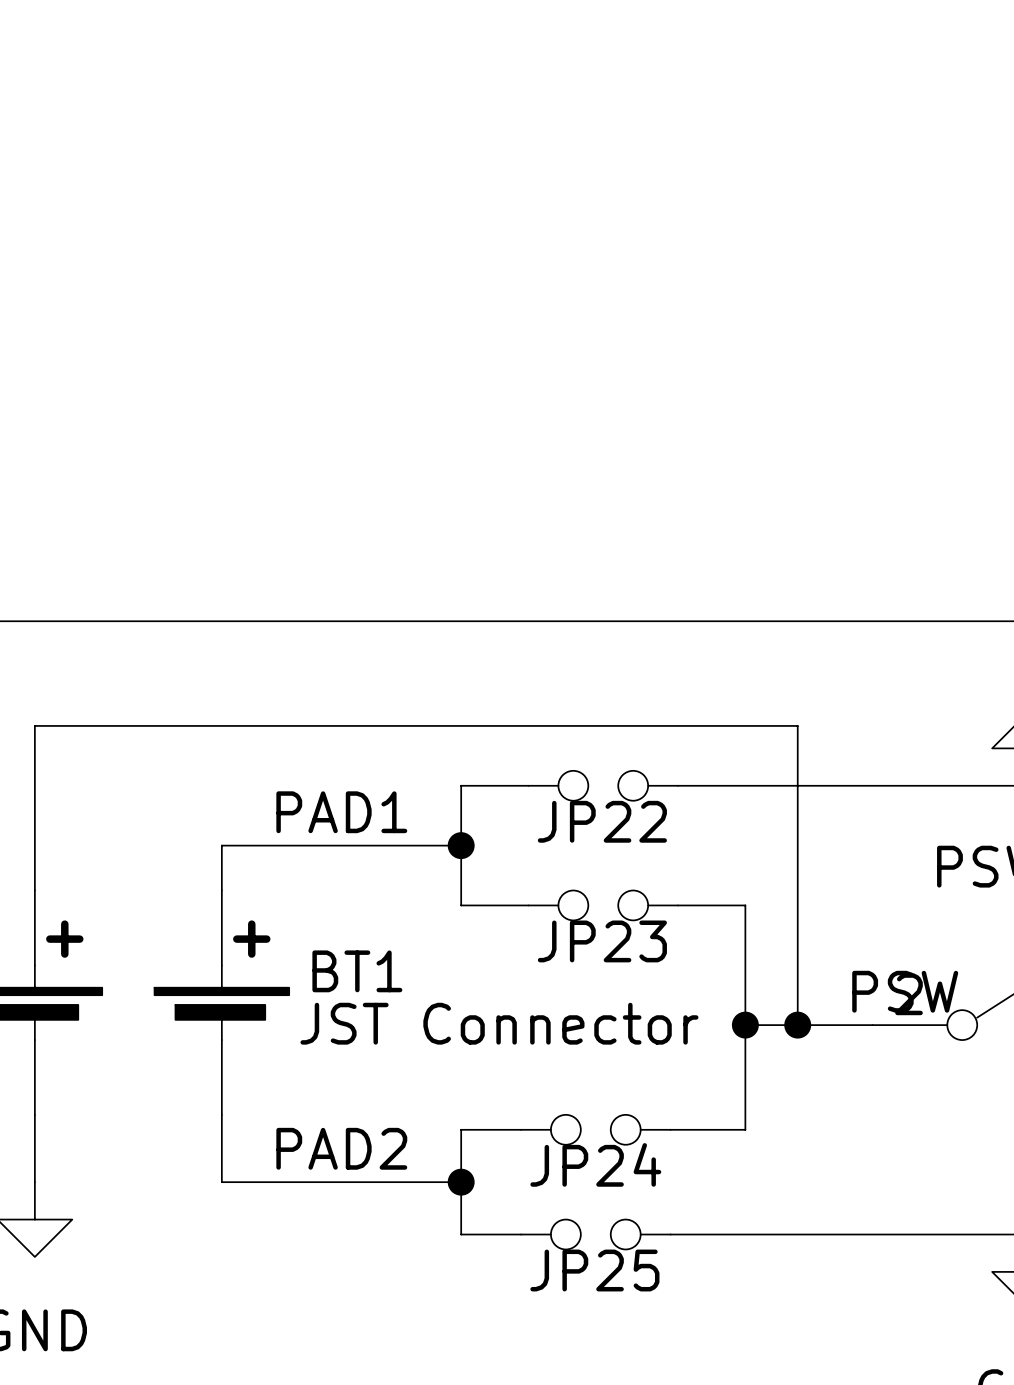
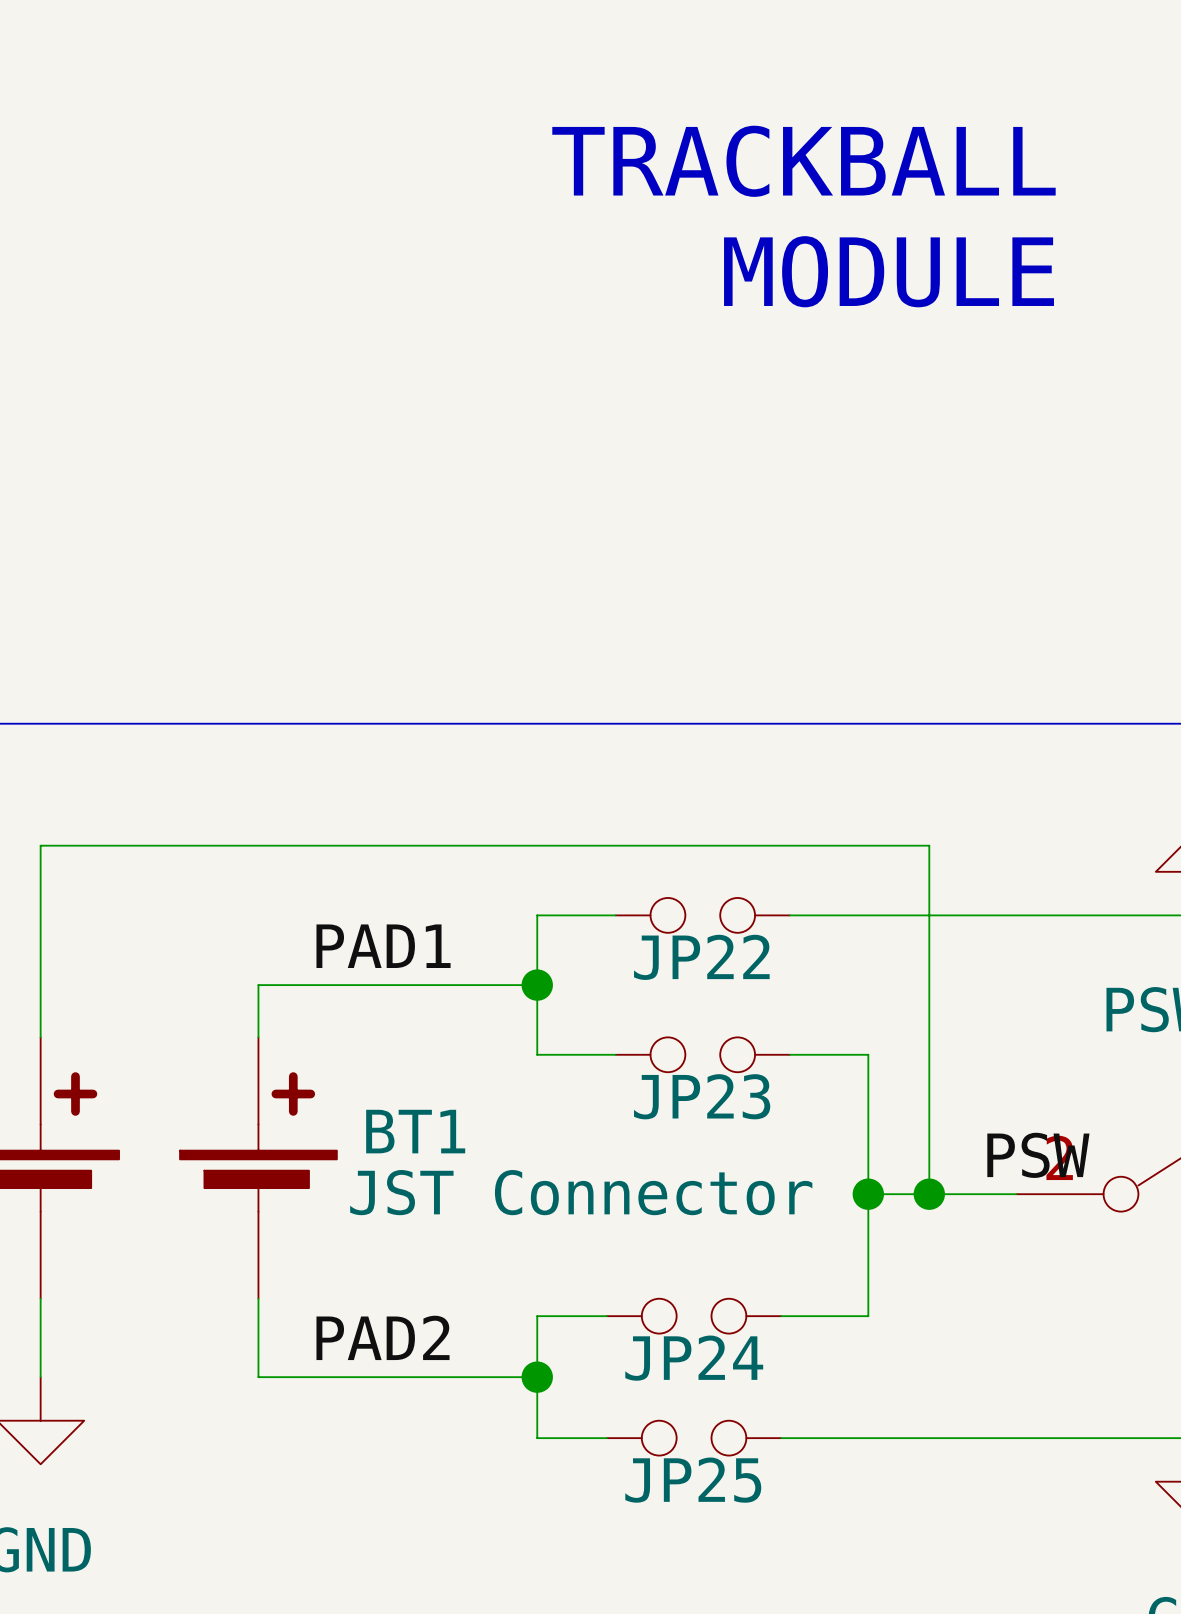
text: none -> TRACKBALL (803, 161)
text: none -> MODULE (889, 271)

